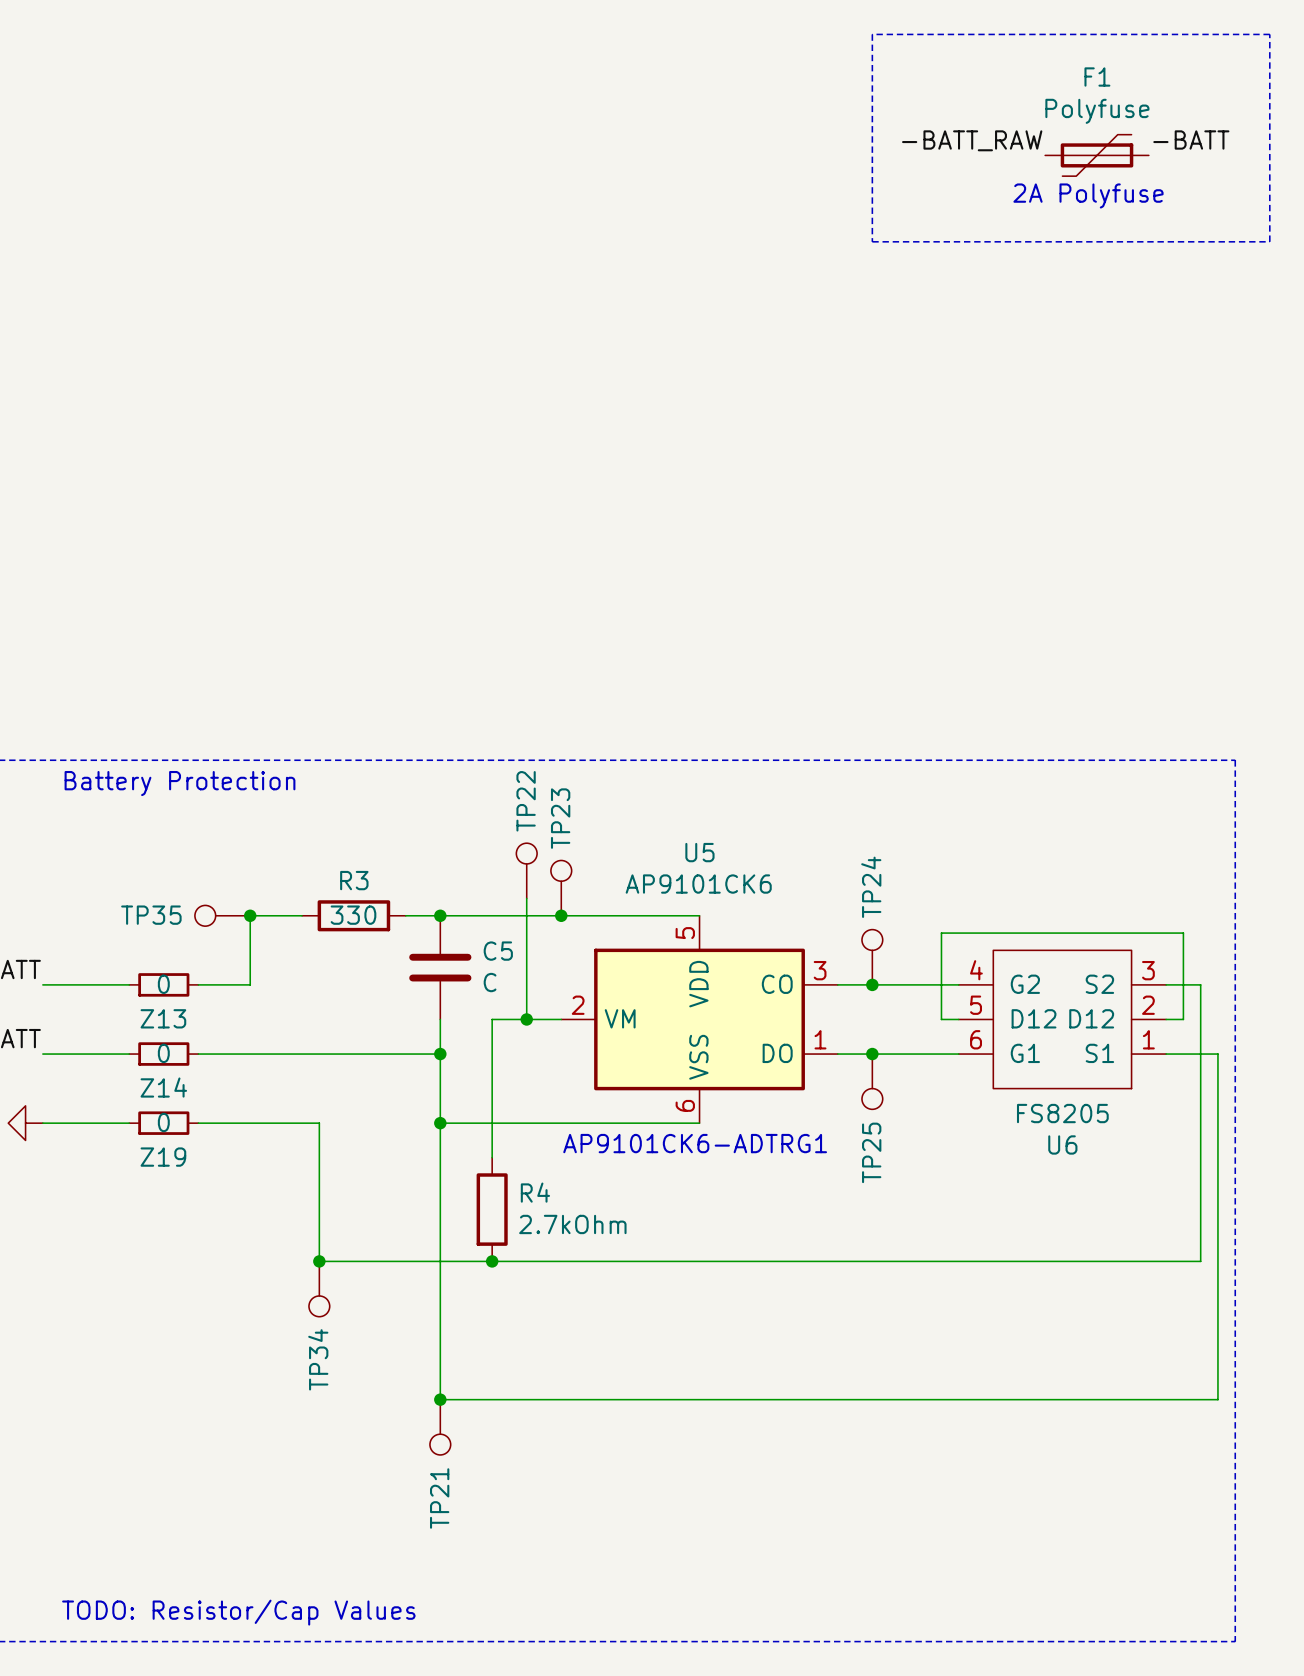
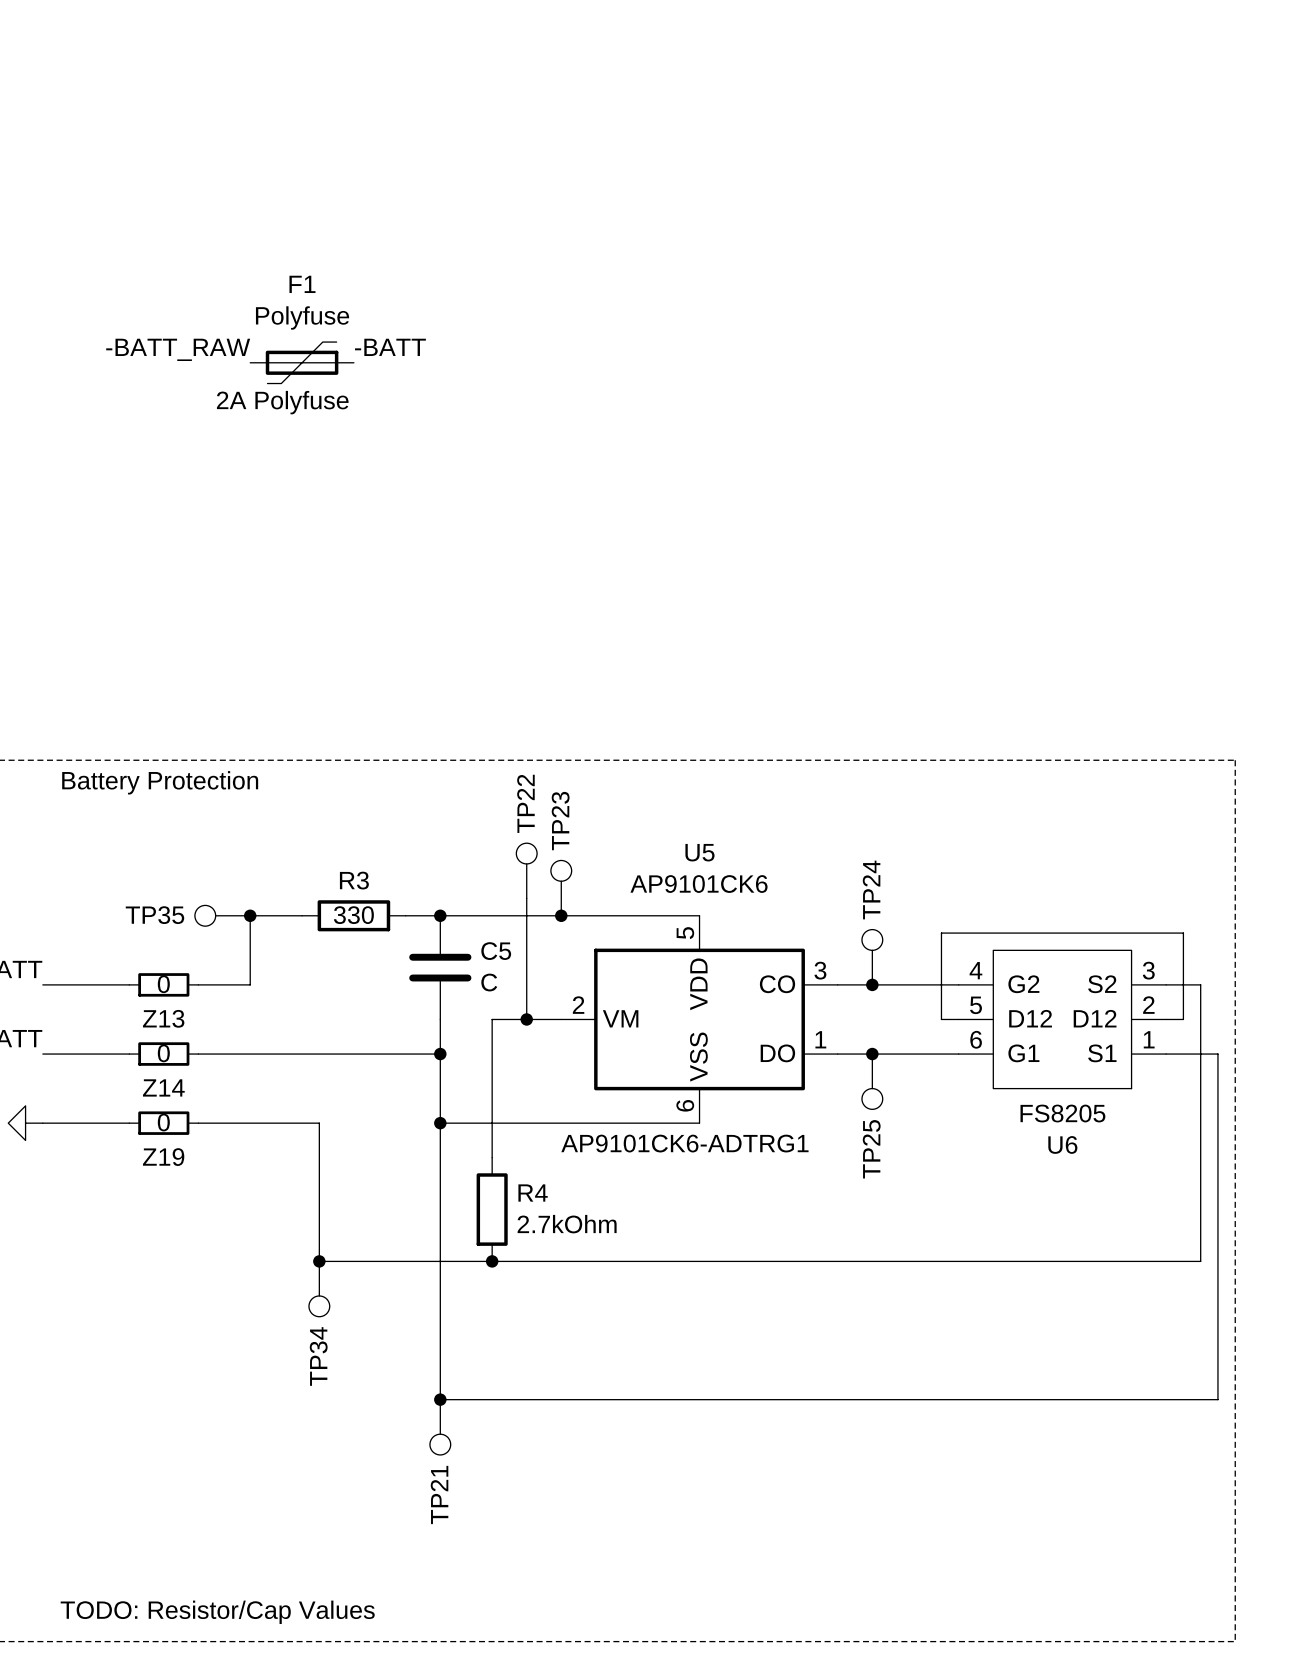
line: (872, 34) (872, 241) (1269, 241) (1269, 34) (872, 34) -> none
label: -BATT (1191, 139) -> none
label: -BATT_RAW (972, 140) -> none
F1 position: (1097, 155) -> (302, 362)
text: 2A Polyfuse (1088, 195) -> none
label: none -> -BATT (390, 347)
label: none -> -BATT_RAW (178, 349)
text: none -> 2A Polyfuse (282, 402)

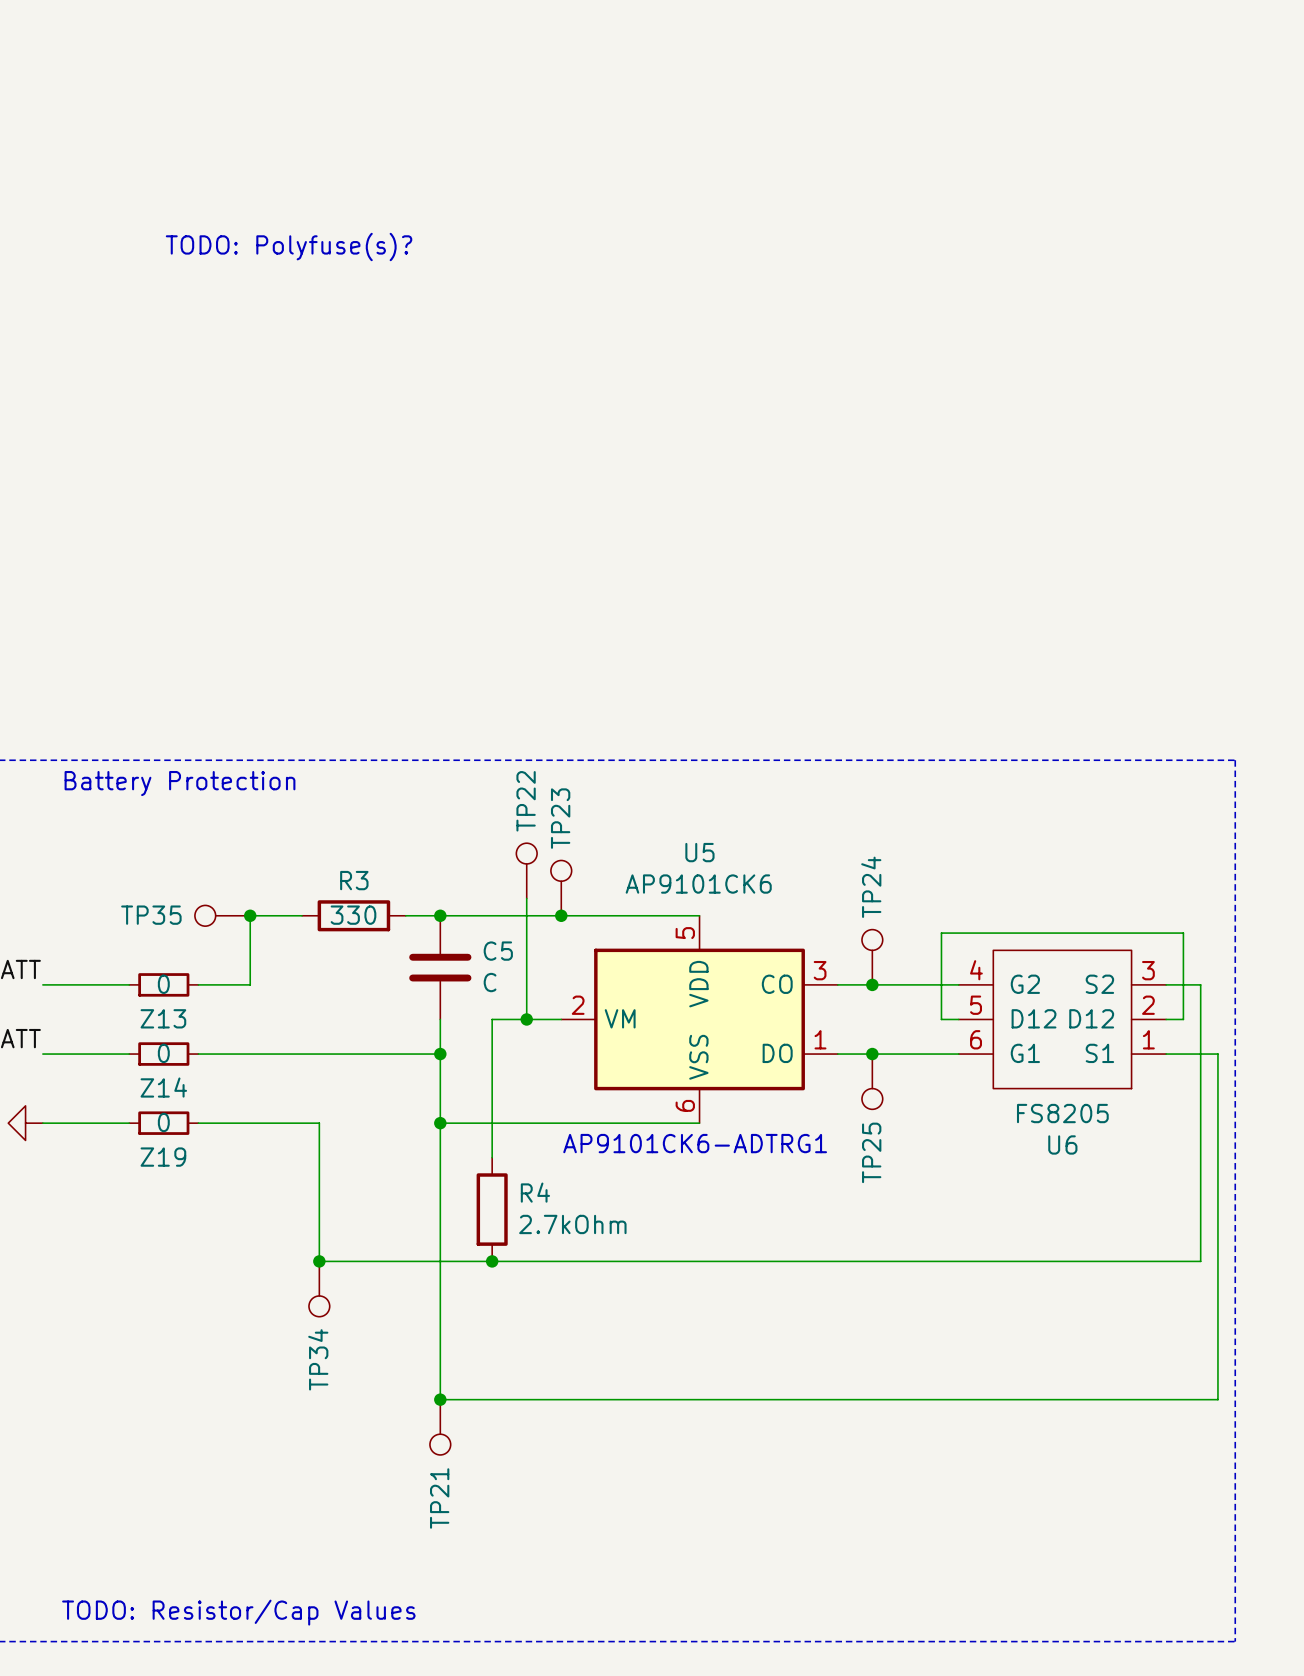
text: none -> TODO: Polyfuse(s)? (289, 247)
label: -BATT (390, 347) -> none
label: -BATT_RAW (178, 349) -> none
F1: Polyfuse (302, 362) -> none
text: 2A Polyfuse (282, 402) -> none

